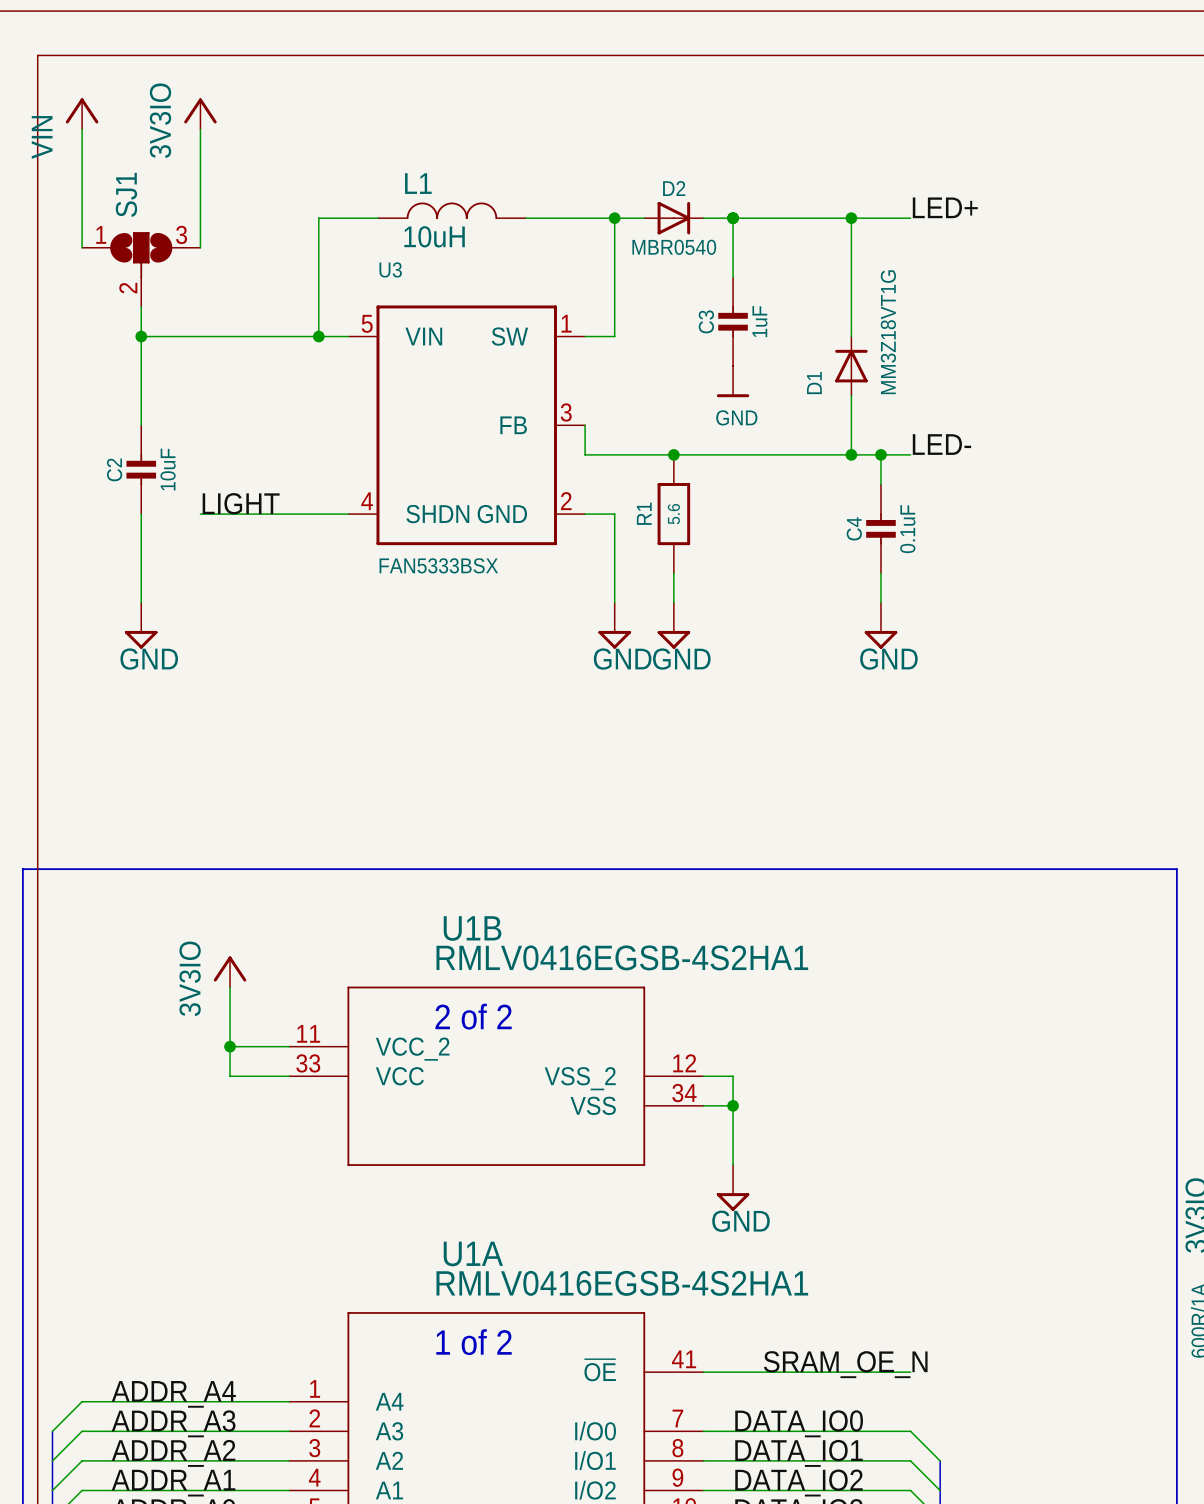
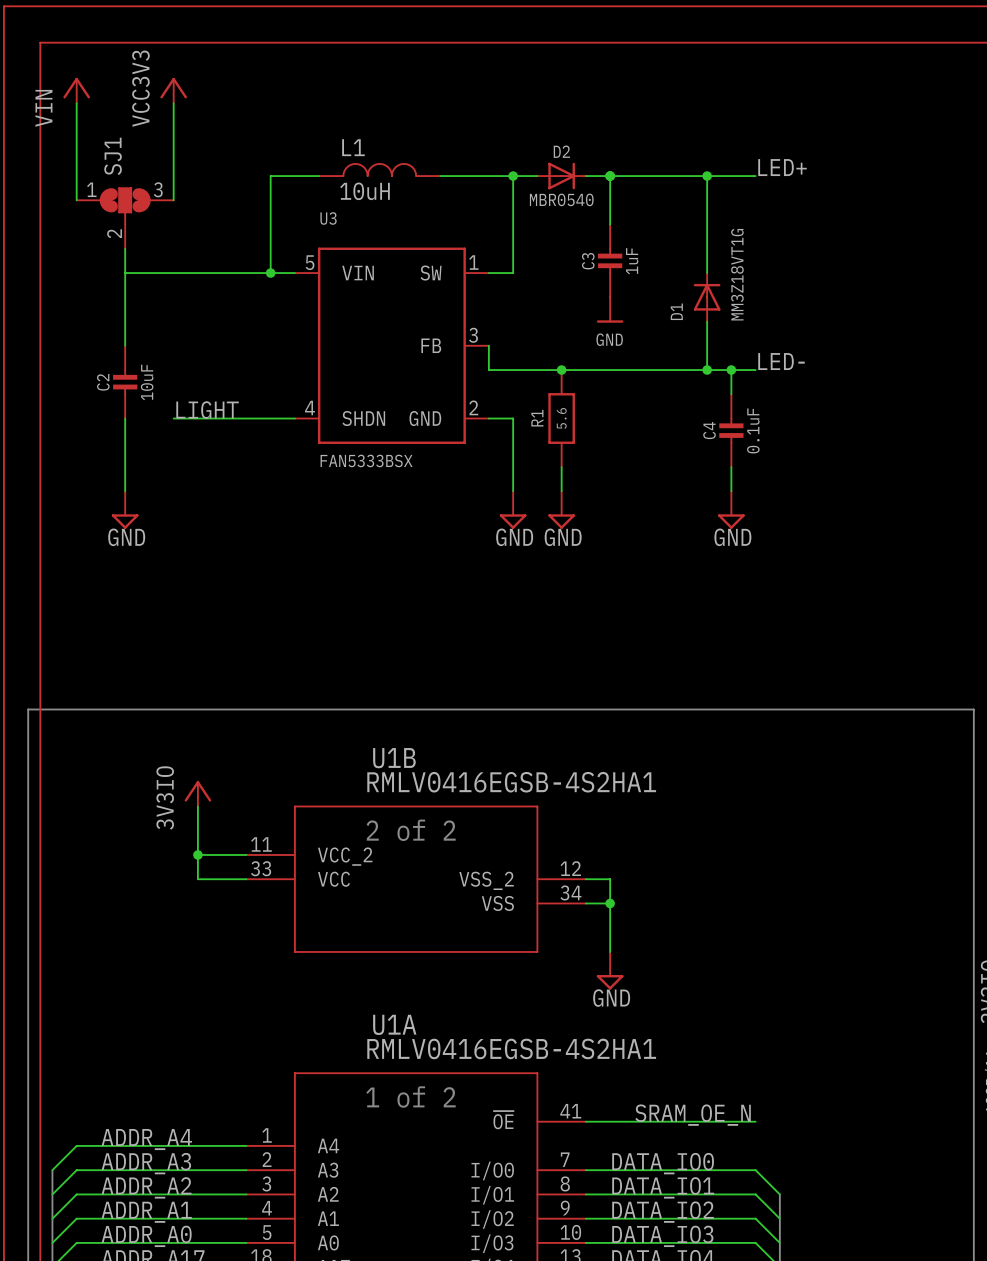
power symbol: 3V3IO (200, 113) -> VCC3V3 (173, 90)
junction: (141, 336) -> none

